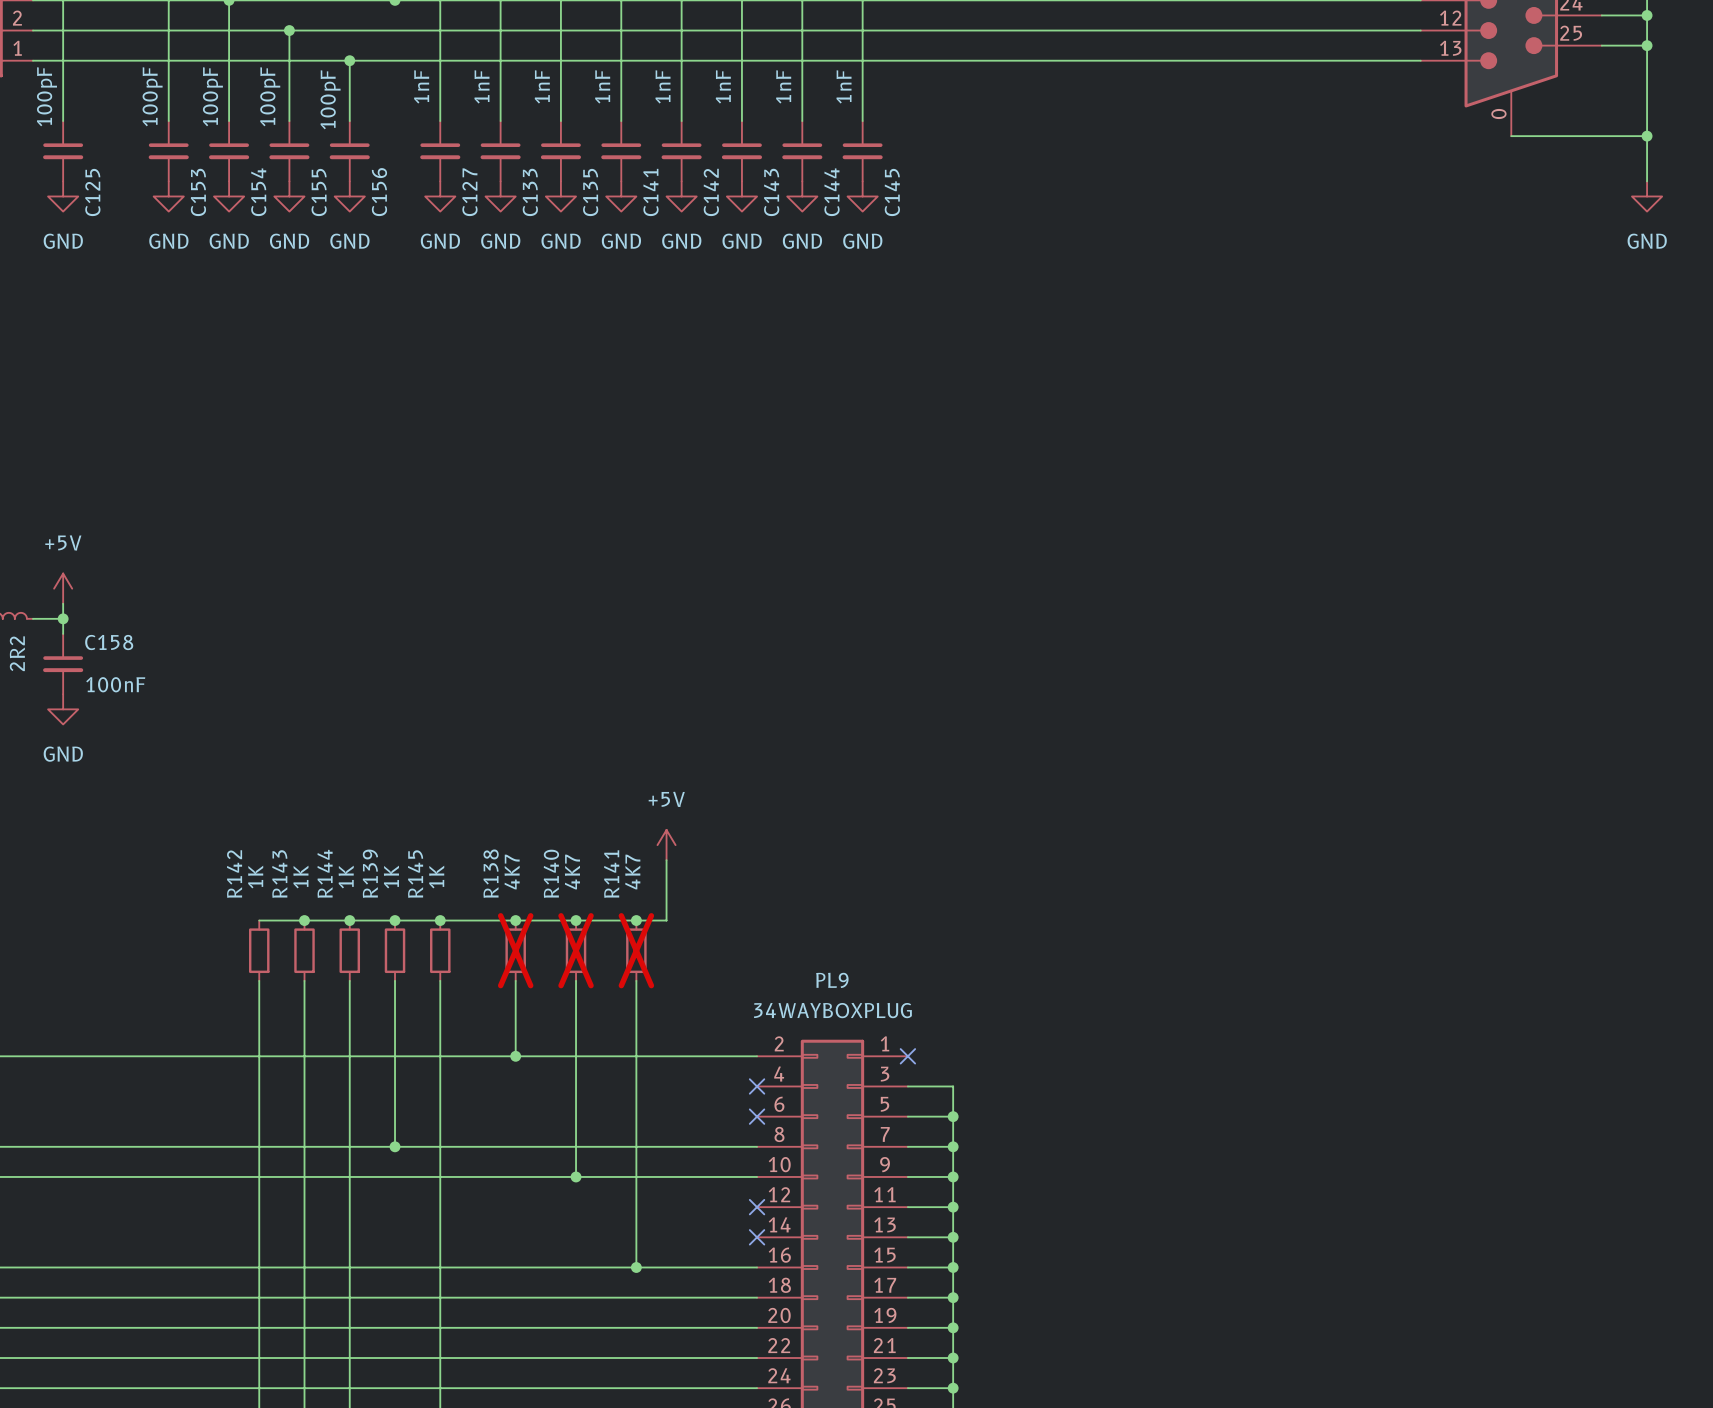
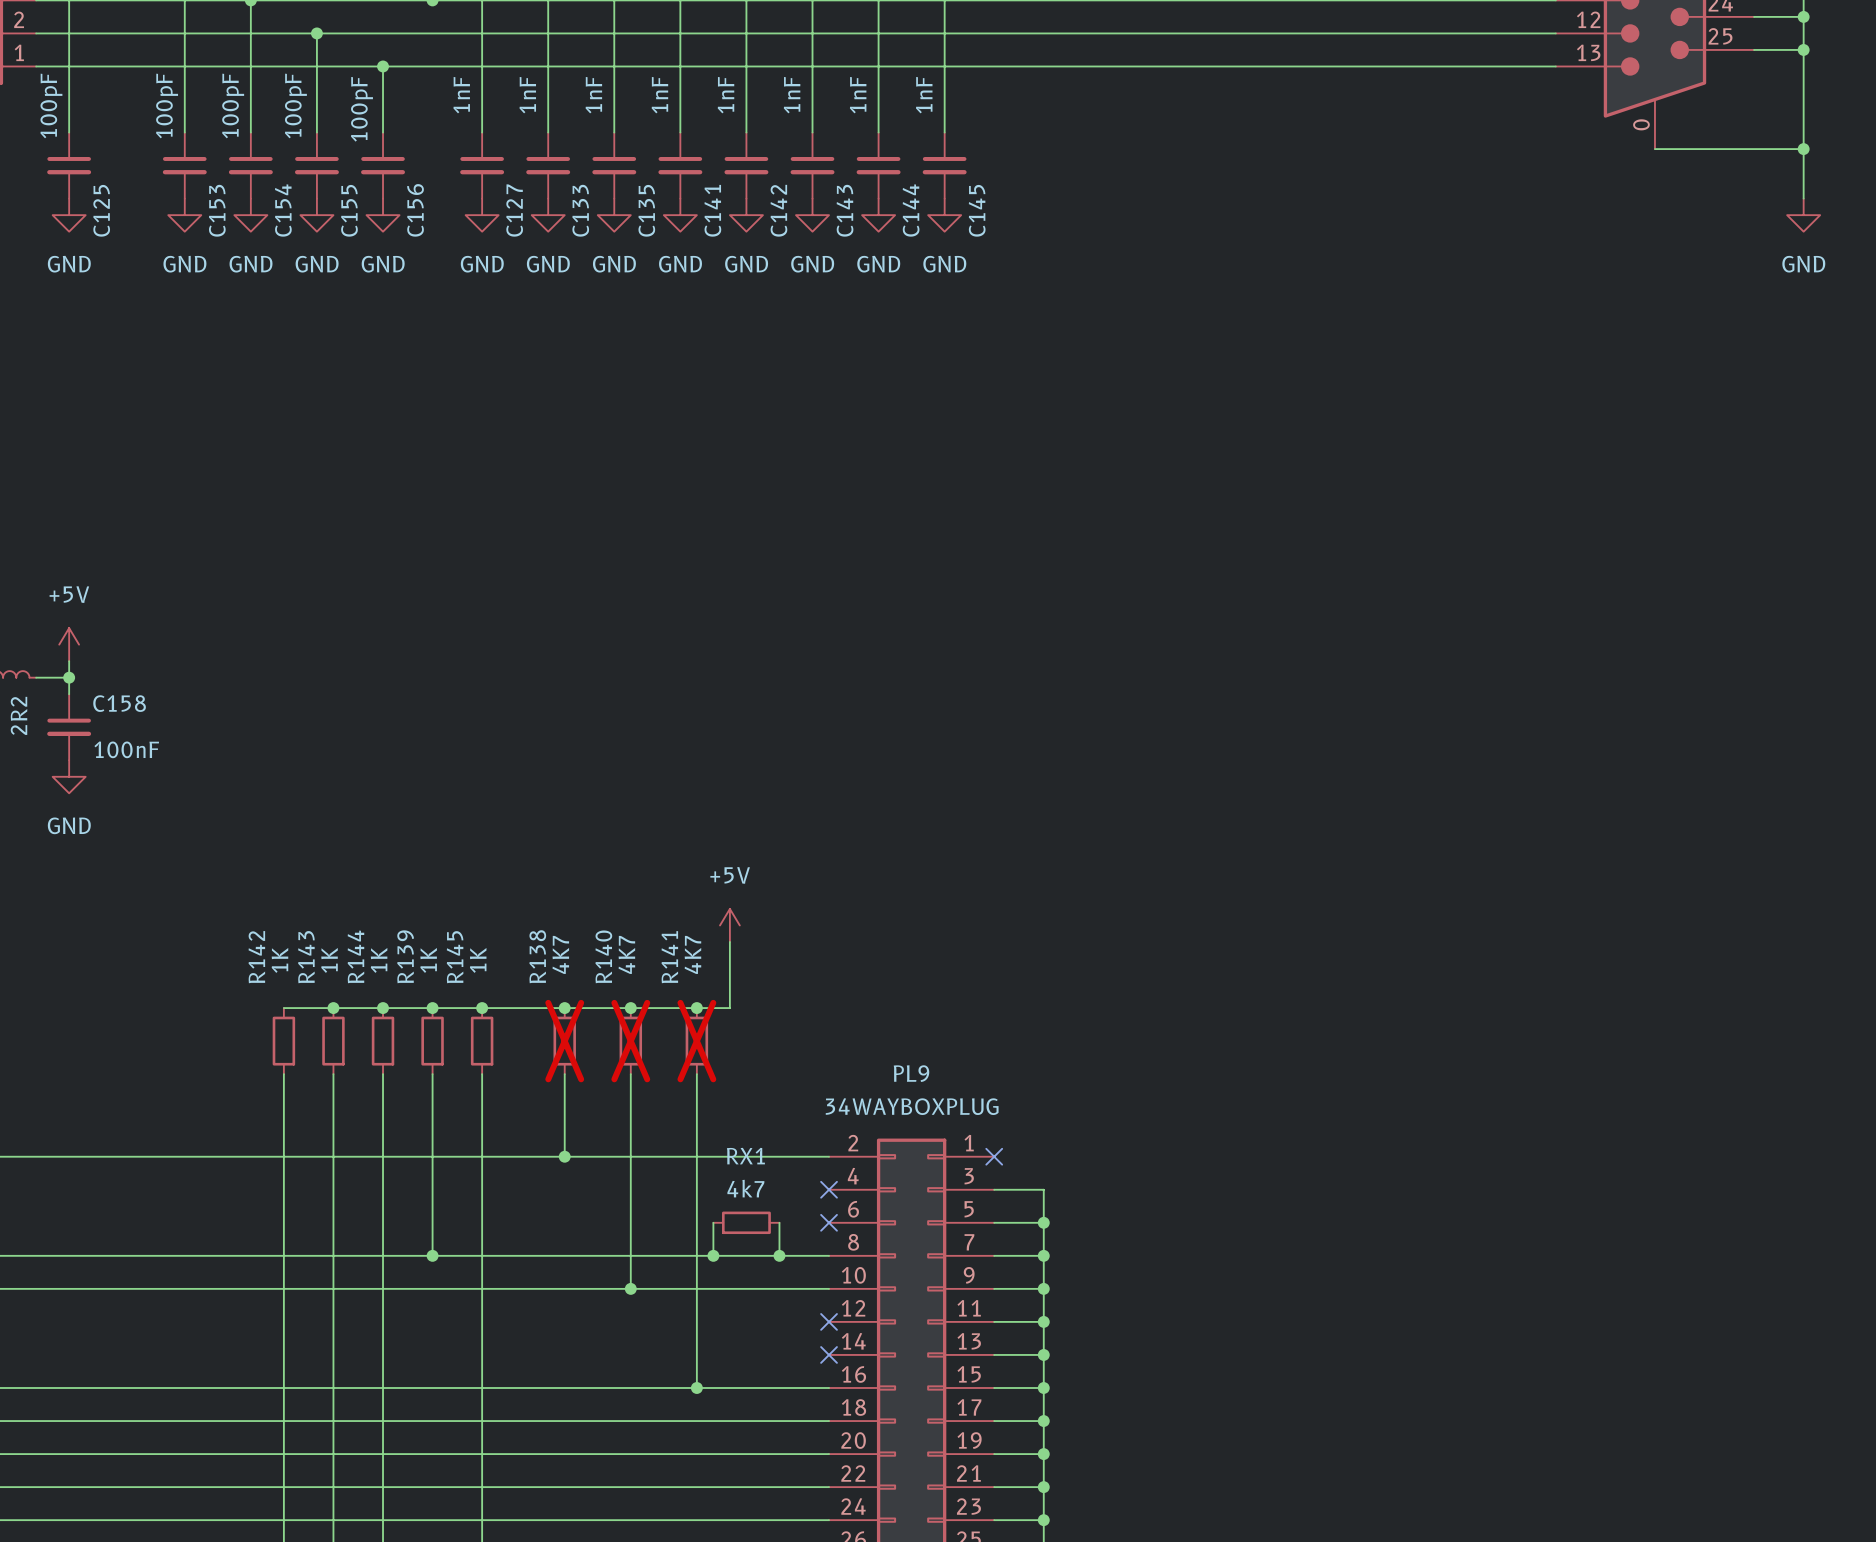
wire: none -> (713, 1222) (713, 1255)
RX1: none -> 4k7 (746, 1222)
wire: none -> (779, 1222) (779, 1255)
junction: none -> (713, 1255)
junction: none -> (779, 1255)

